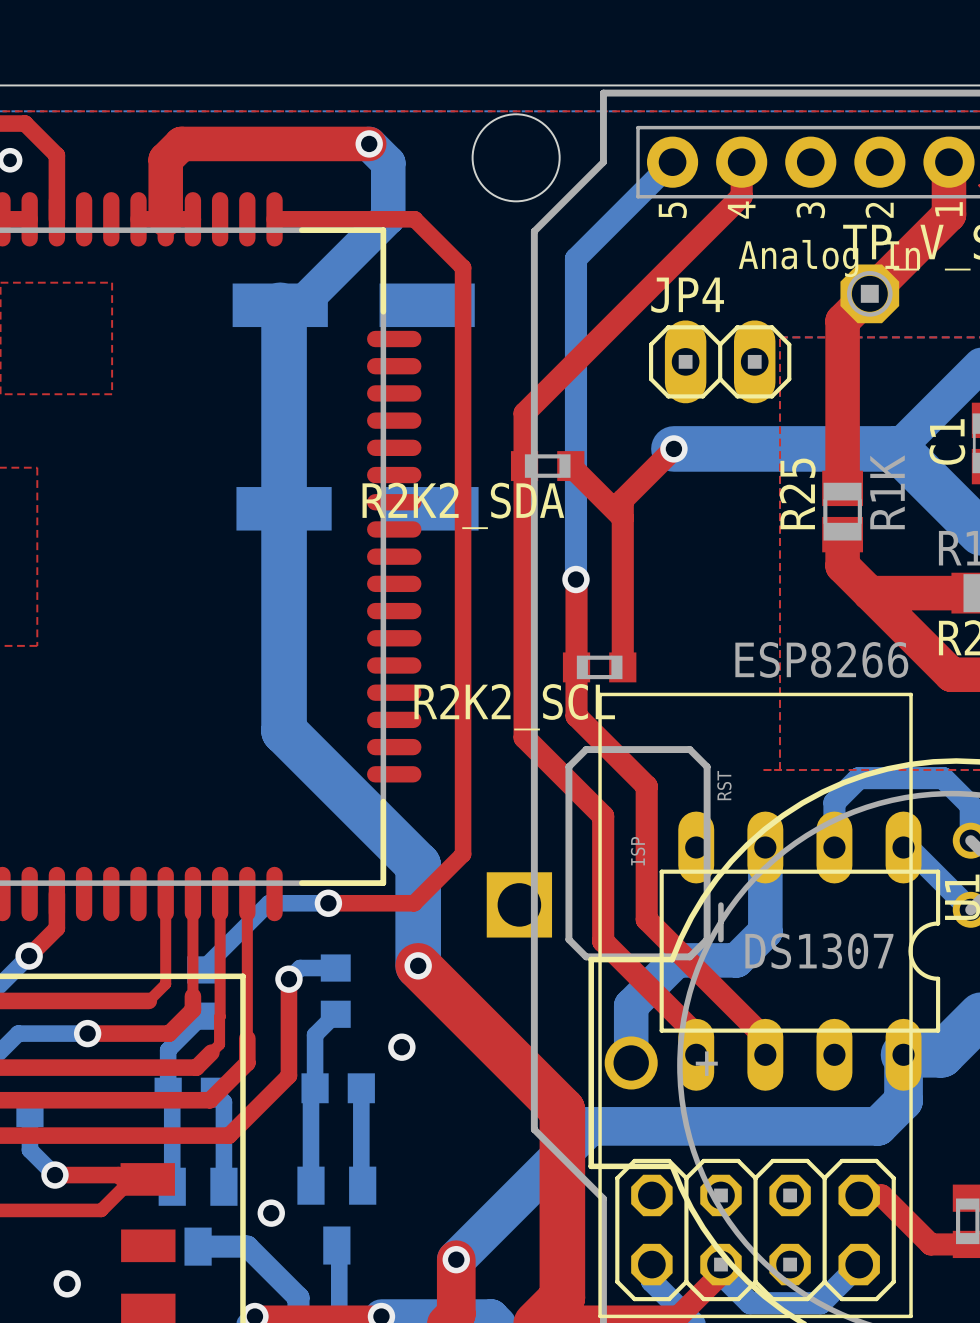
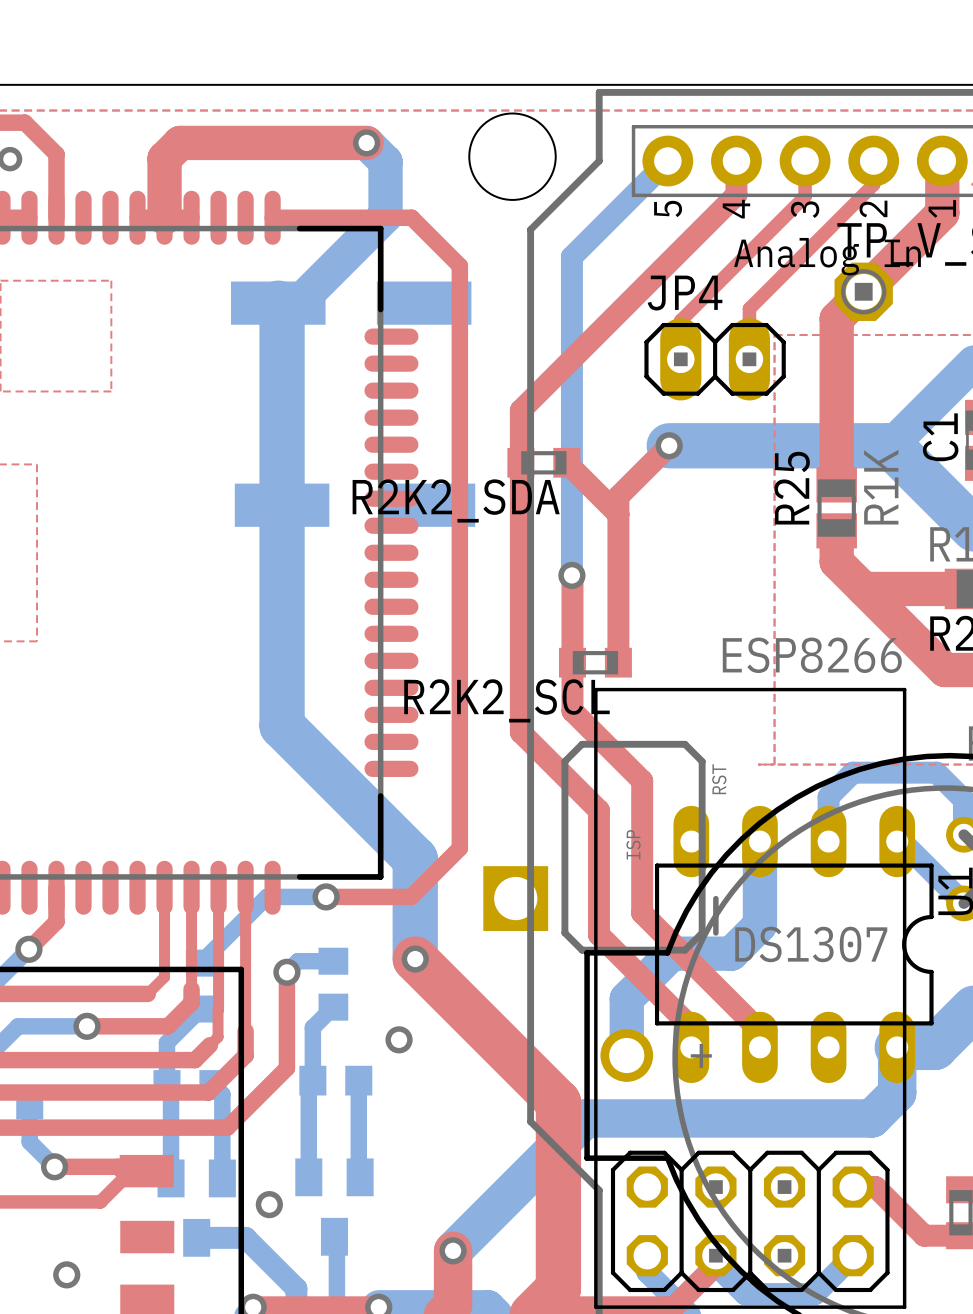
top track: none -> (805, 161) (805, 196) (680, 320) (680, 359)
top track: none -> (873, 161) (873, 184) (749, 308) (749, 359)

